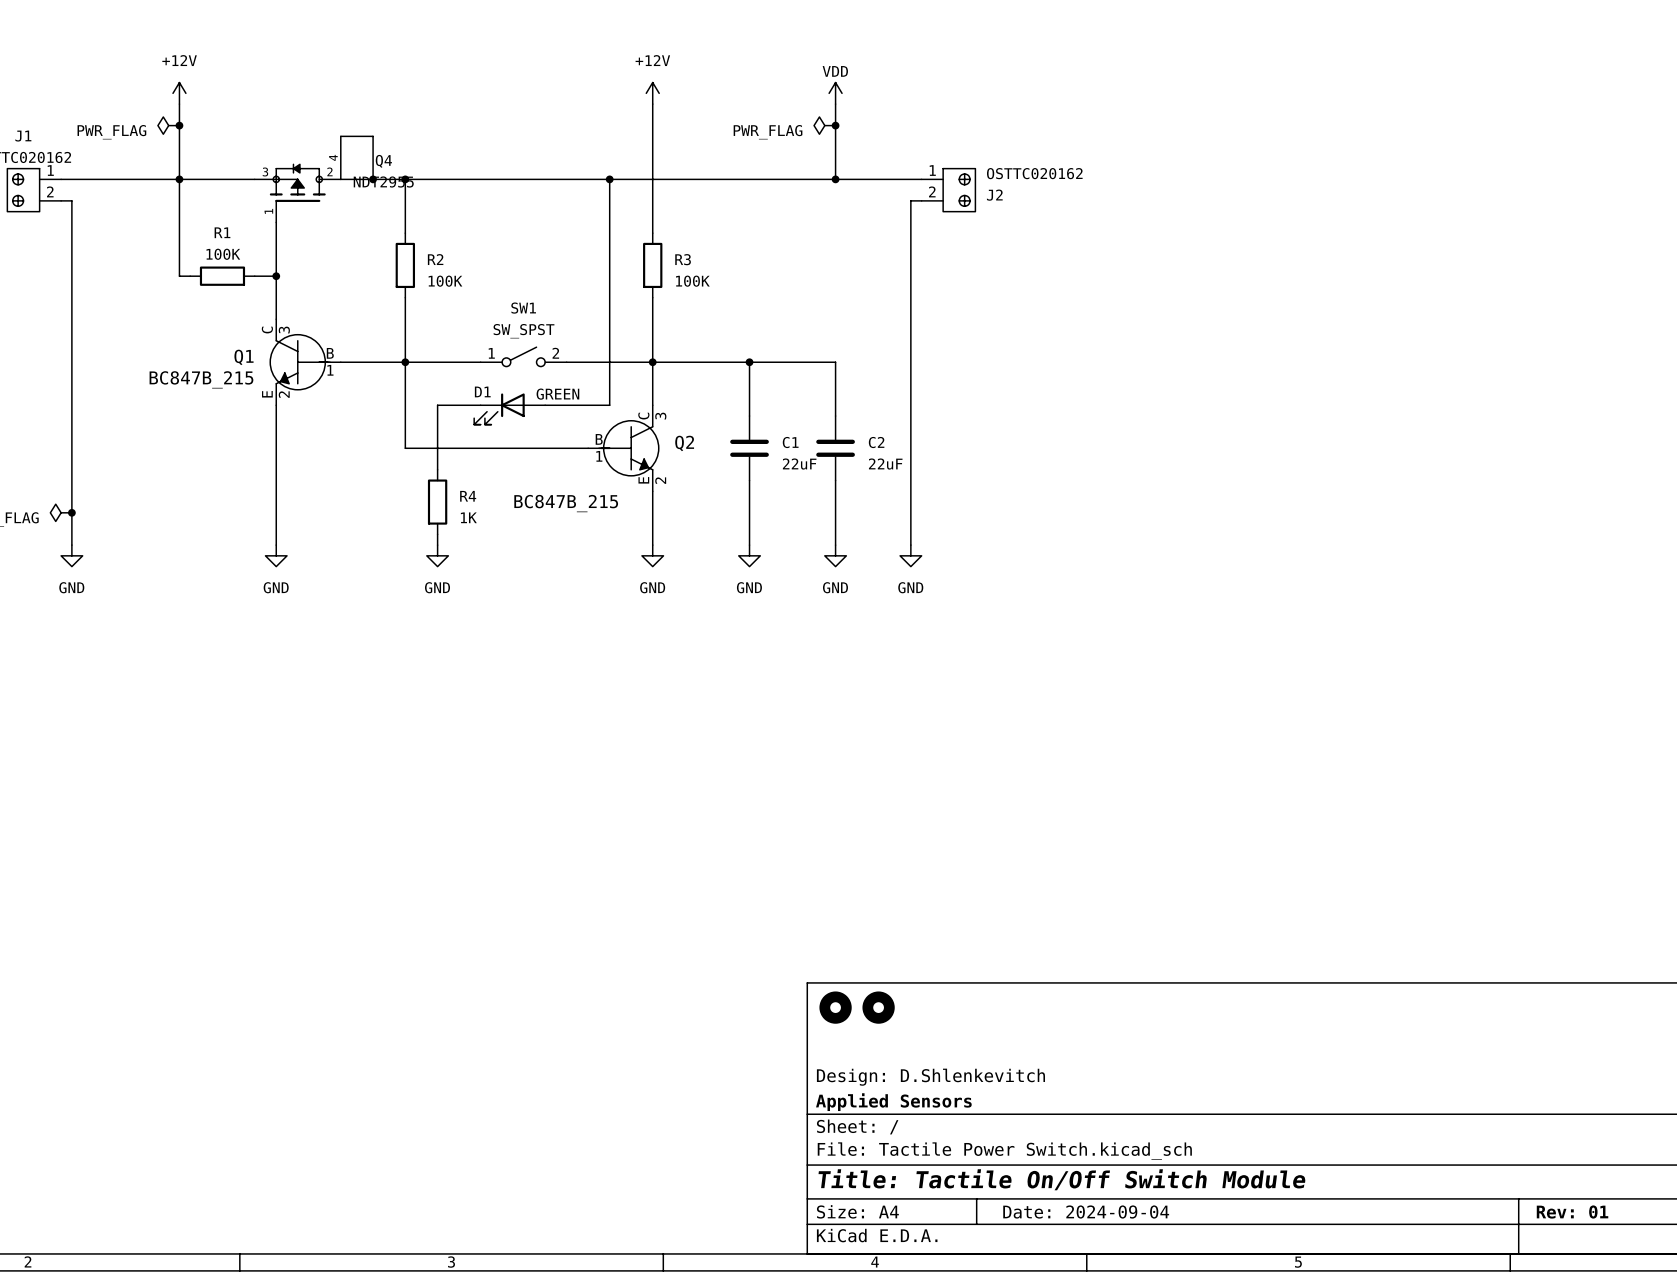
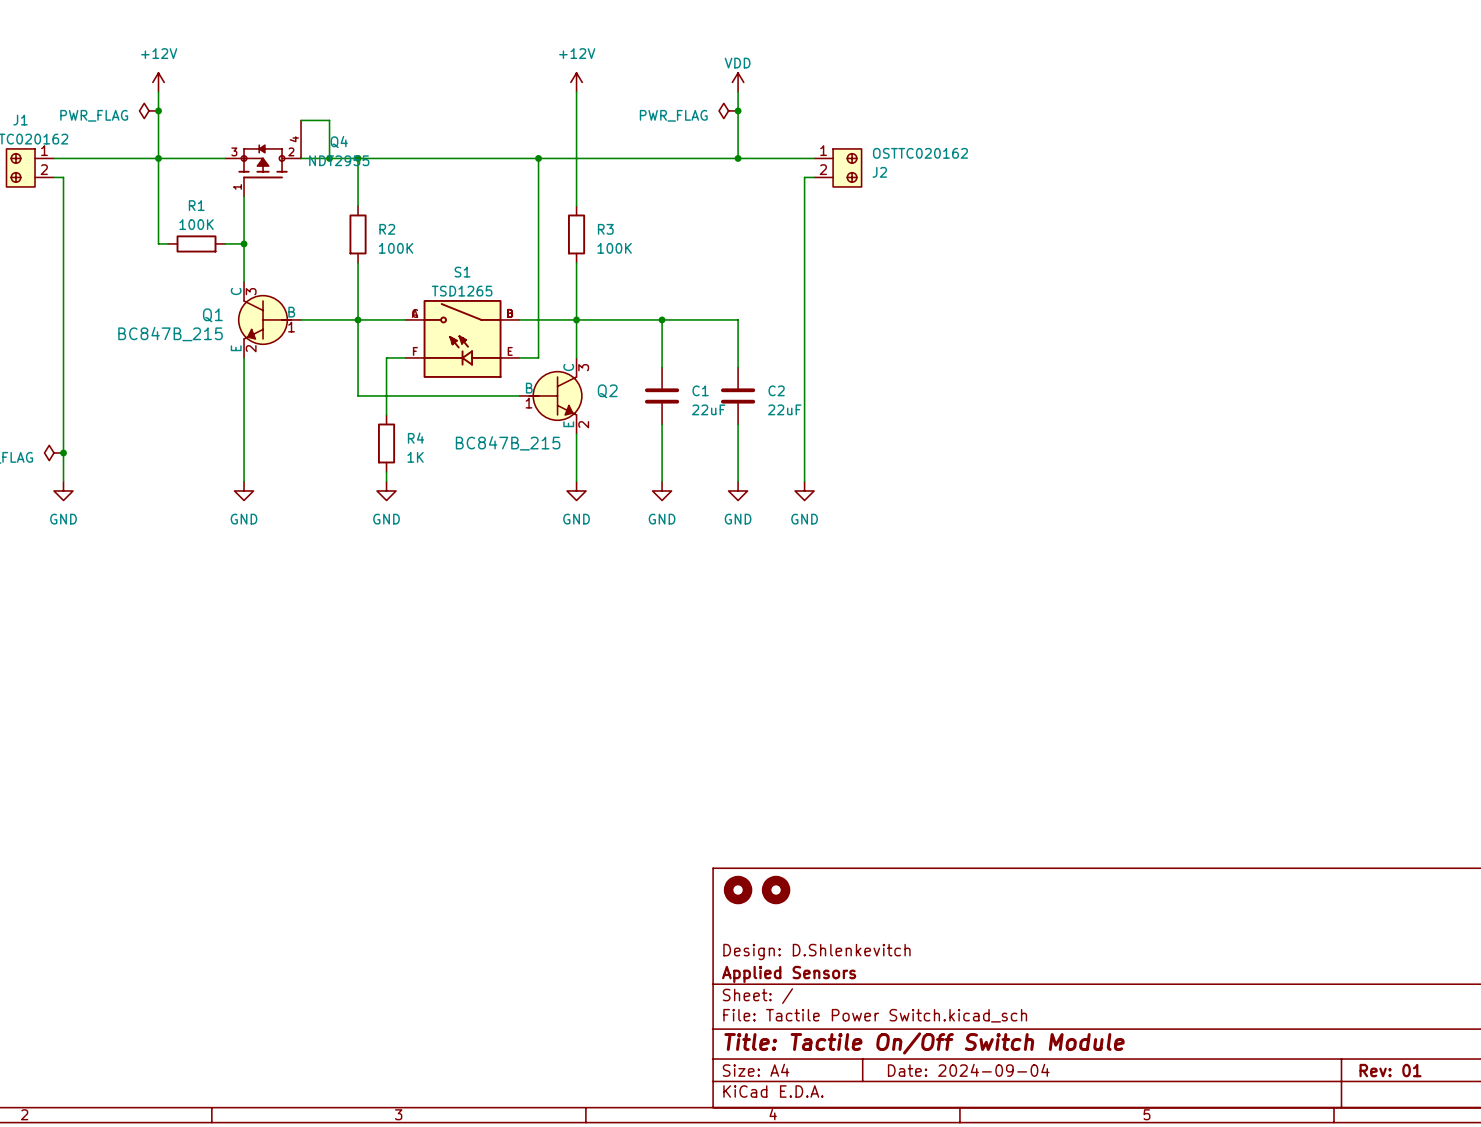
SW1: SW_SPST (523, 356) -> none
S1: none -> TSD1265 (462, 338)
D1: GREEN (509, 409) -> none

